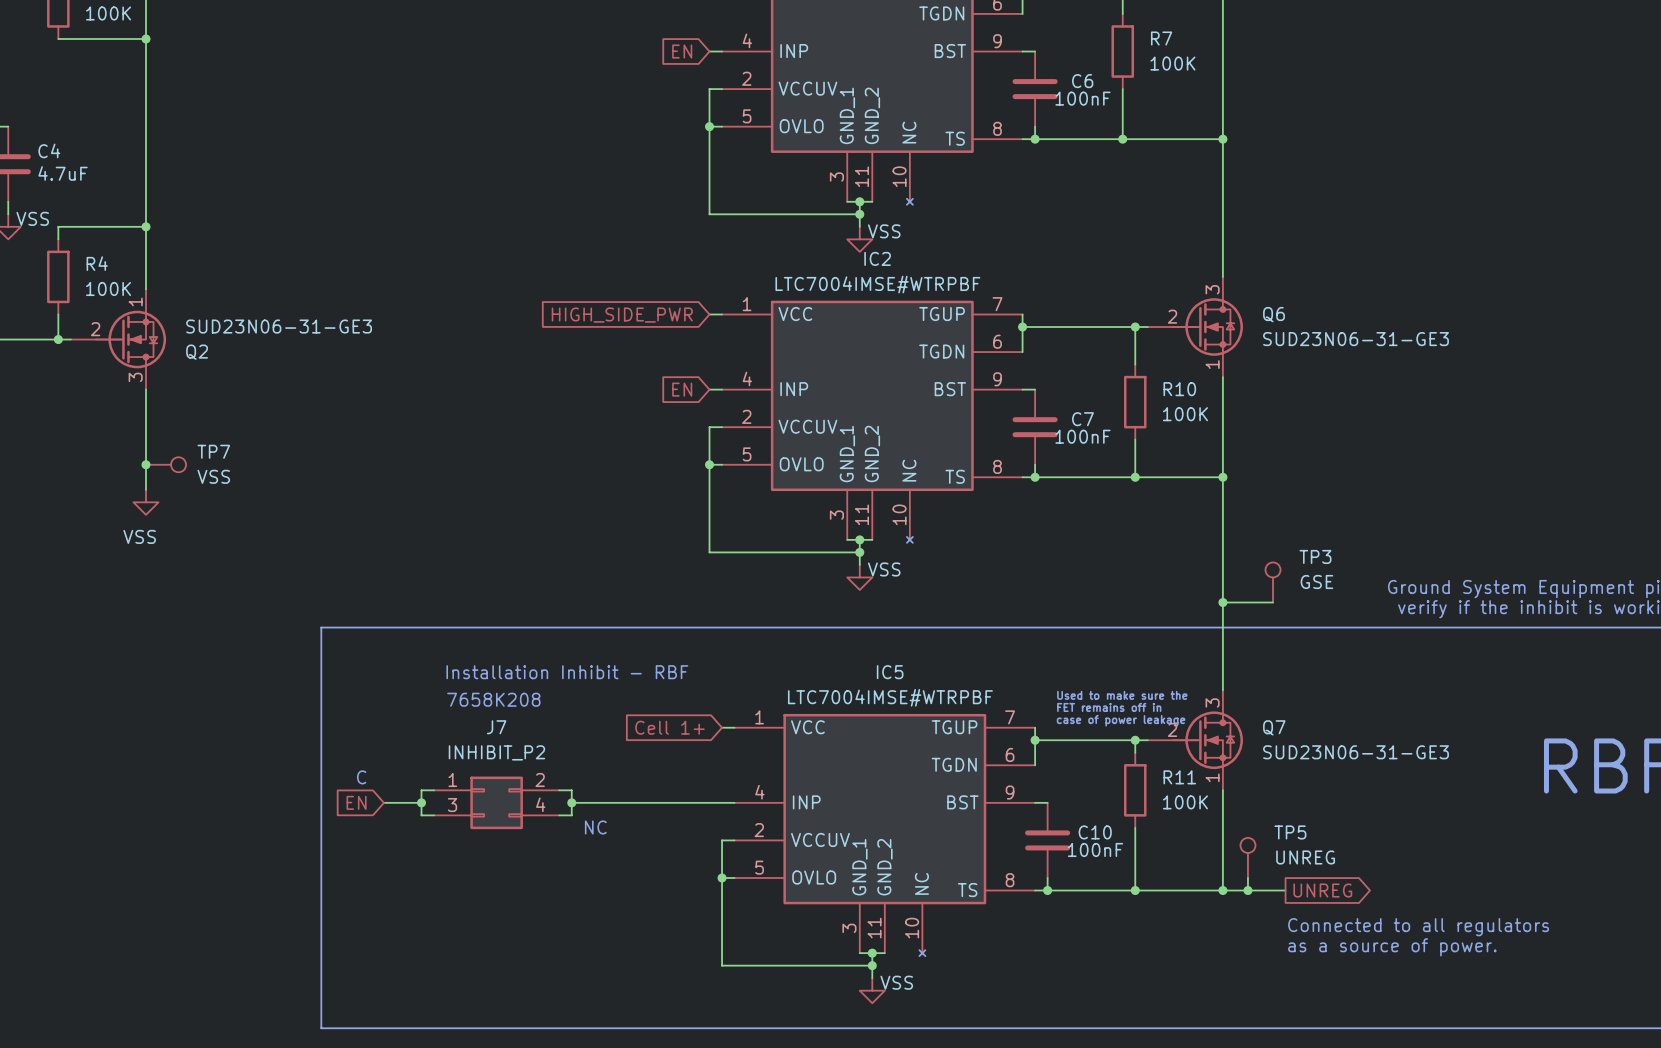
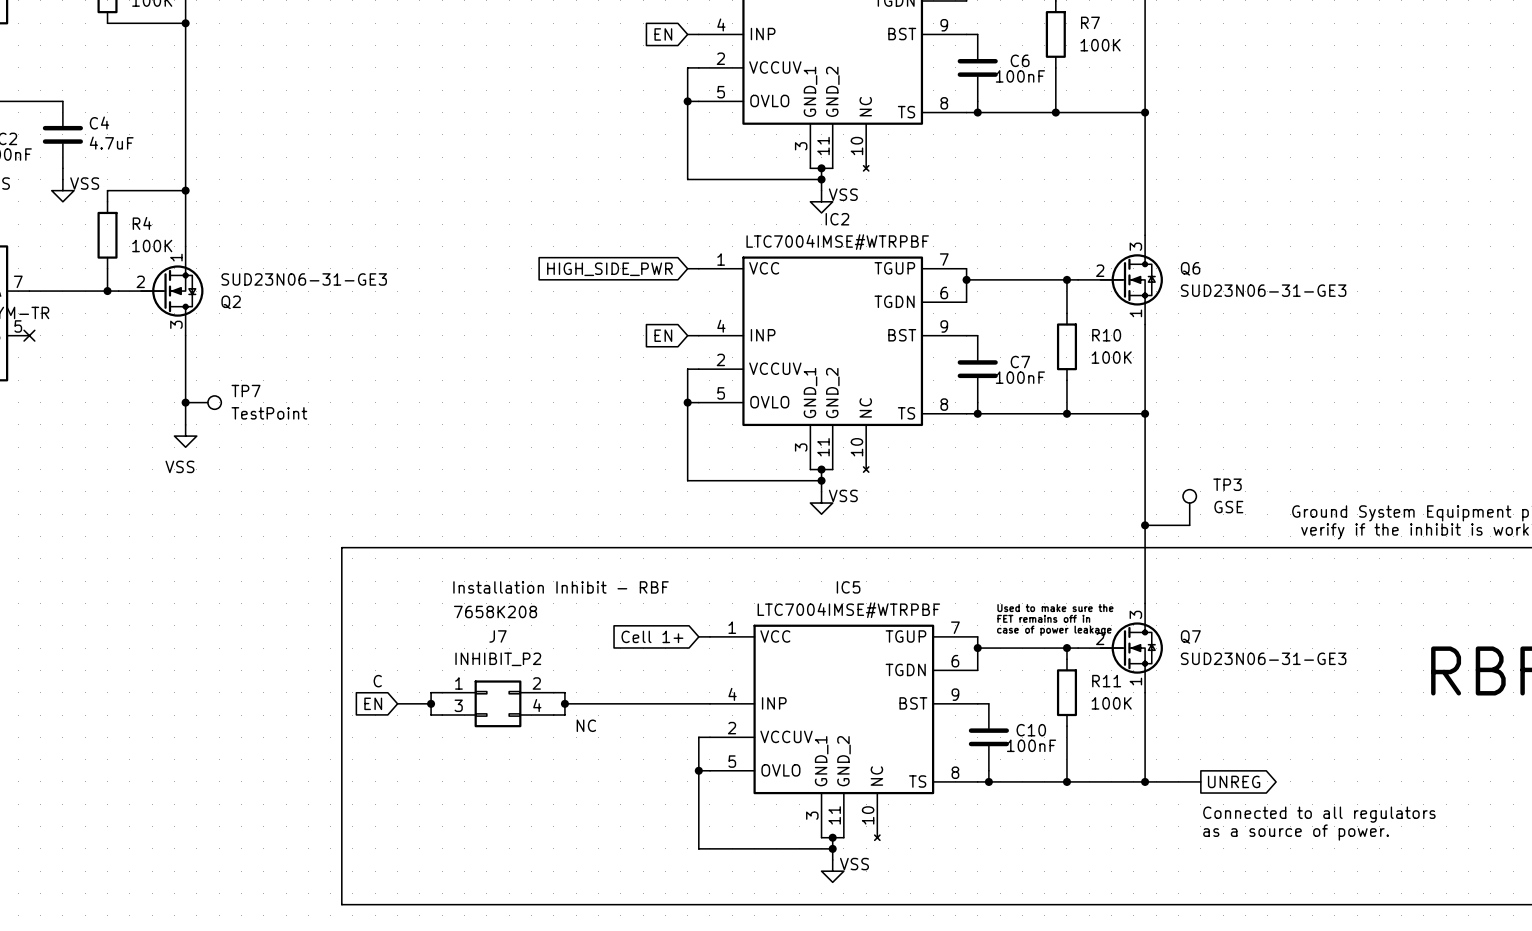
TP7 value: VSS (213, 476) -> TestPoint (269, 413)
TP5: UNREG (1247, 857) -> none
wire: (1247, 877) (1247, 890) -> none
junction: (1247, 890) -> none

